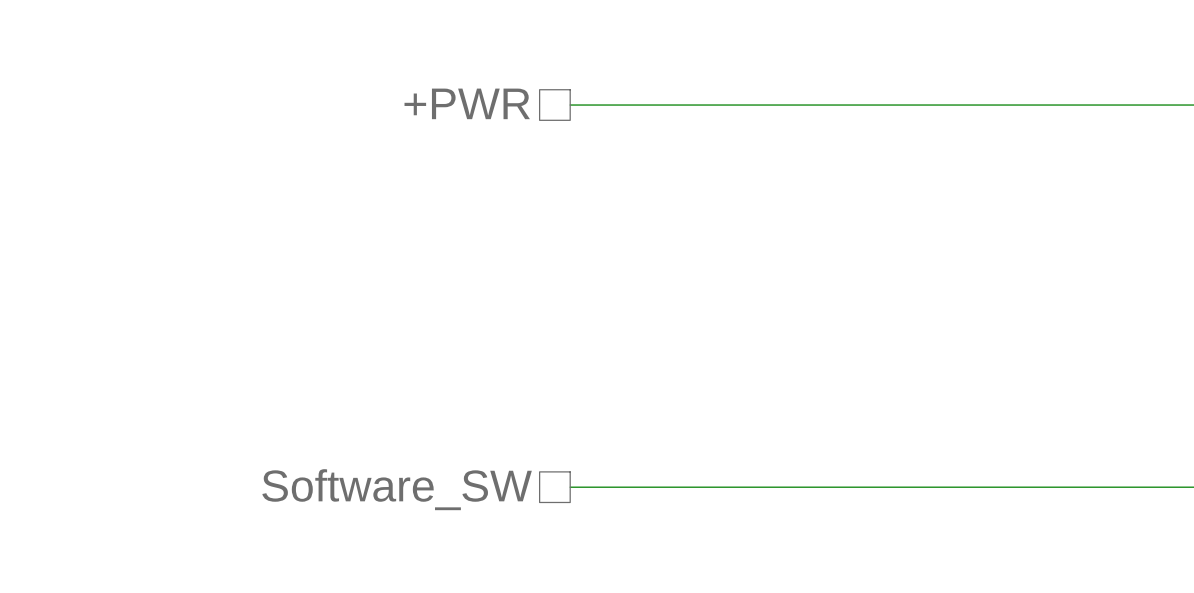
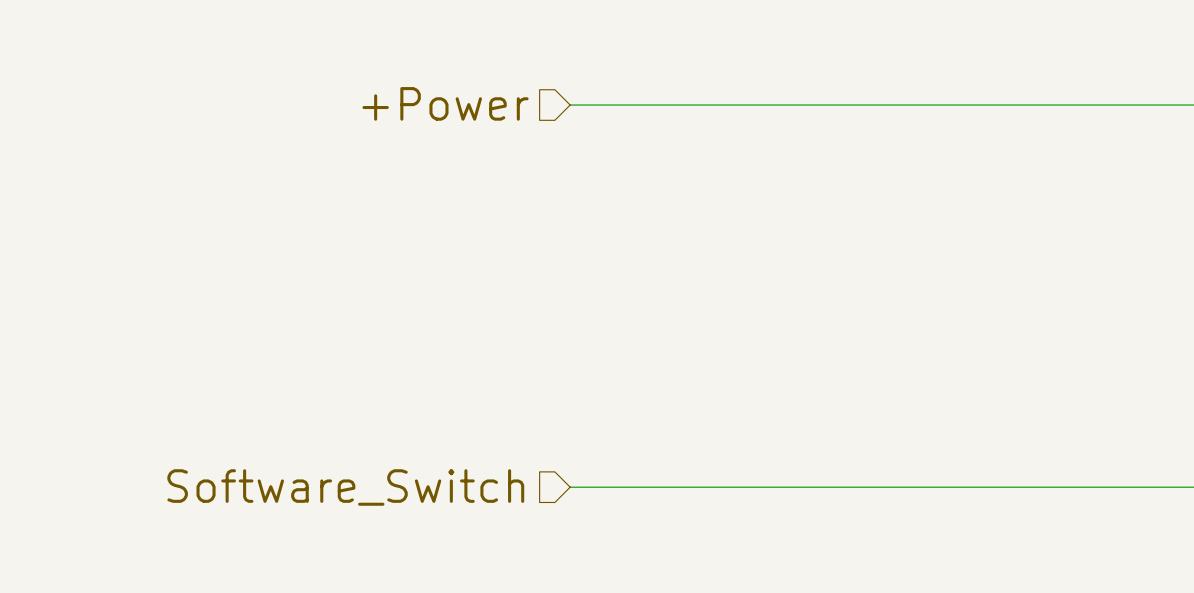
hierarchical label shape: passive (467, 103) -> input (445, 103)
hierarchical label: +PWR (467, 103) -> +Power (445, 103)
hierarchical label shape: passive (397, 489) -> input (345, 487)
hierarchical label: Software_SW (397, 489) -> Software_Switch (345, 487)

